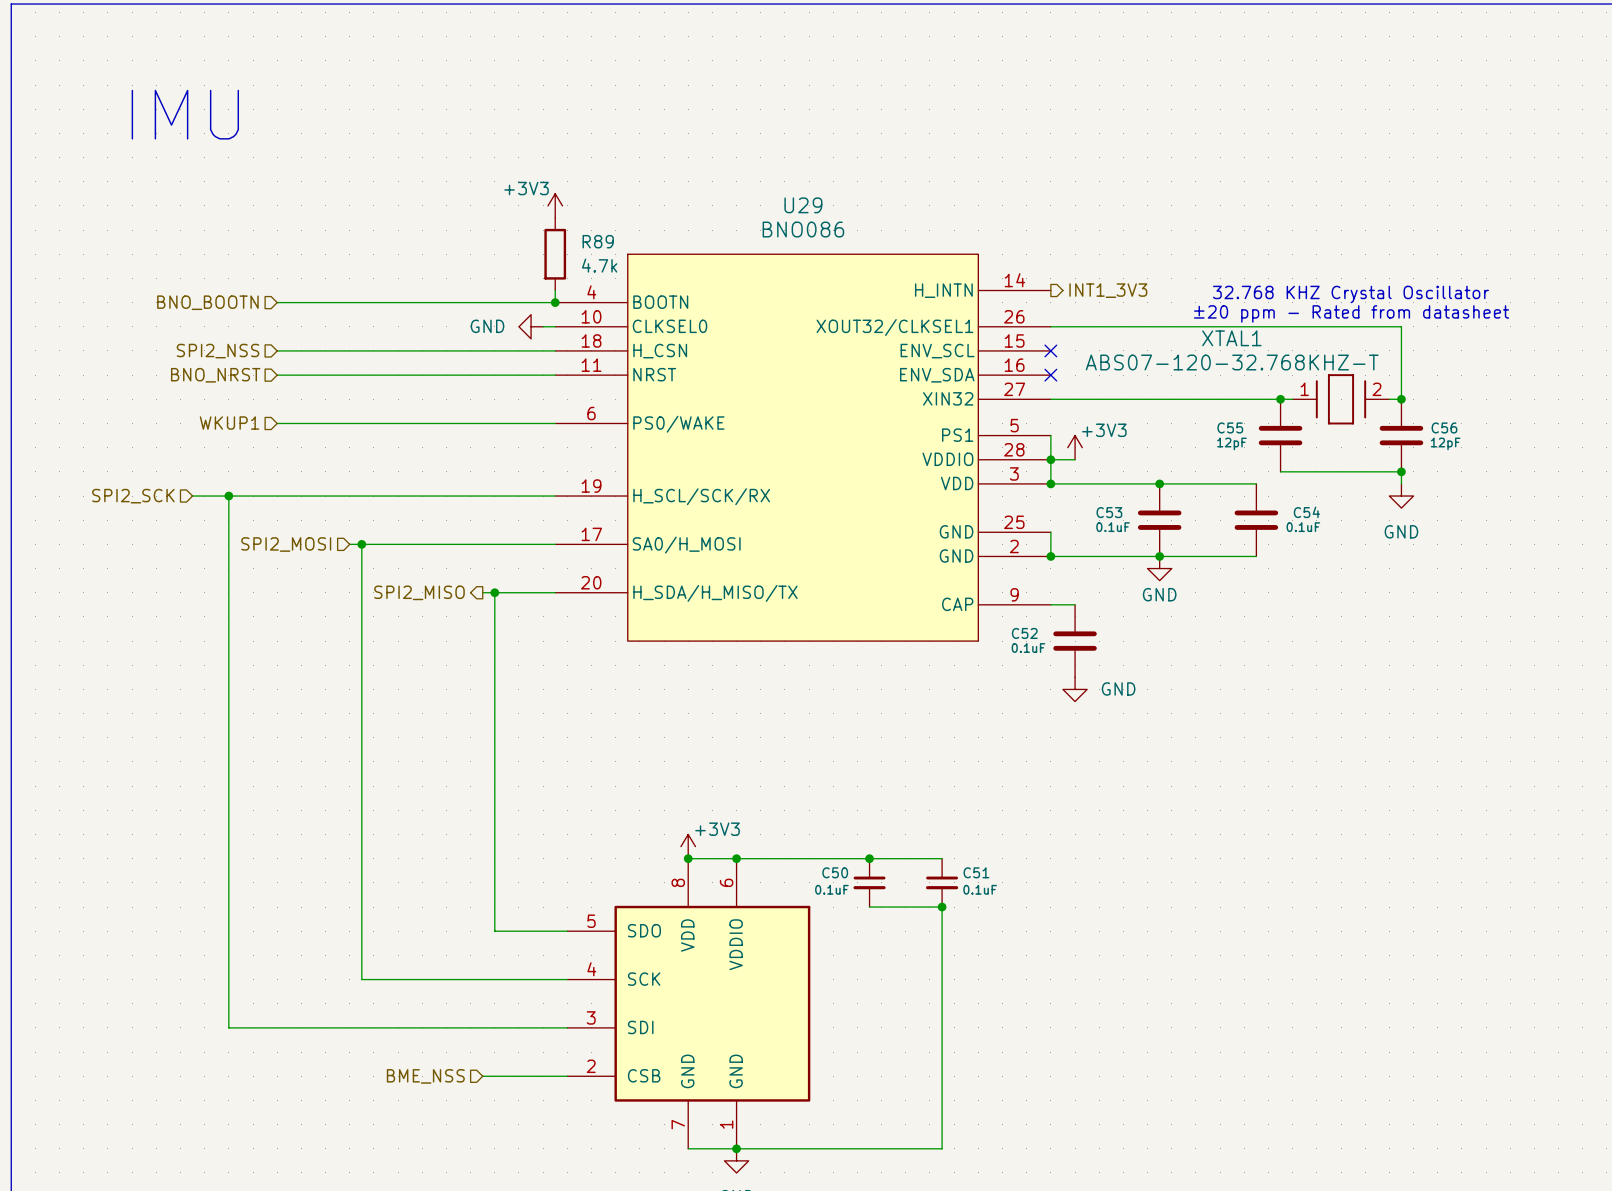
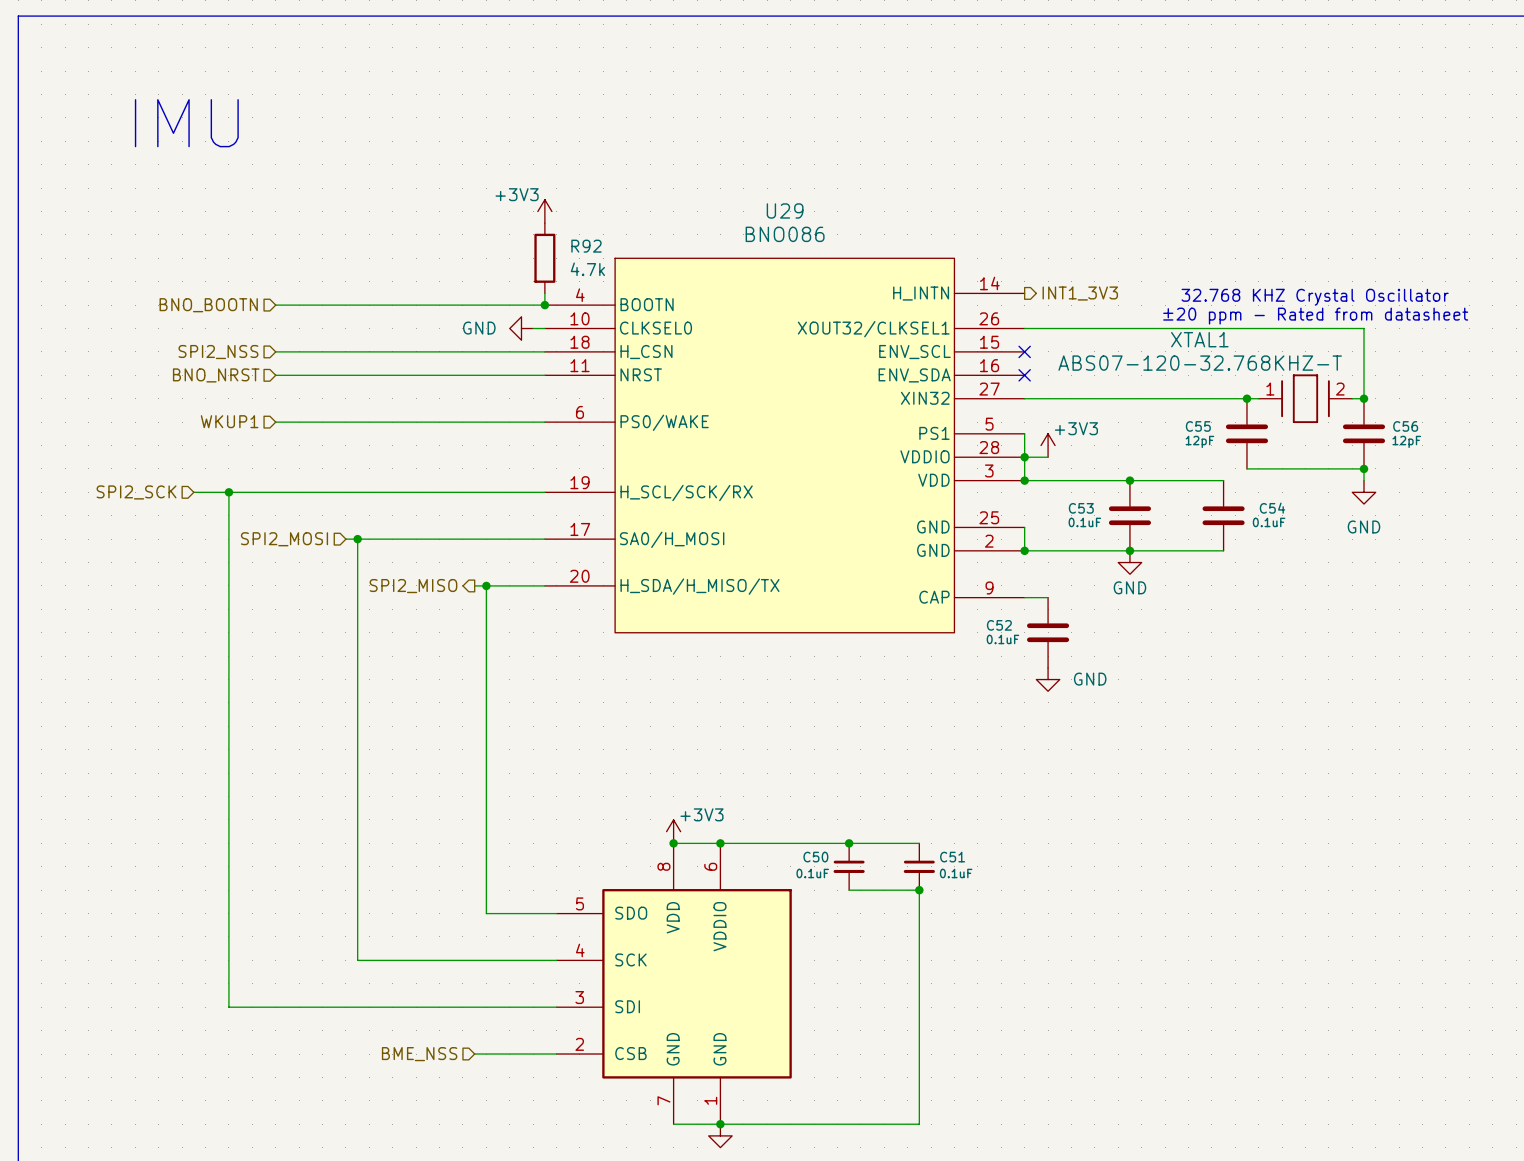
R89 name: R89 (598, 241) -> R92 (586, 246)

